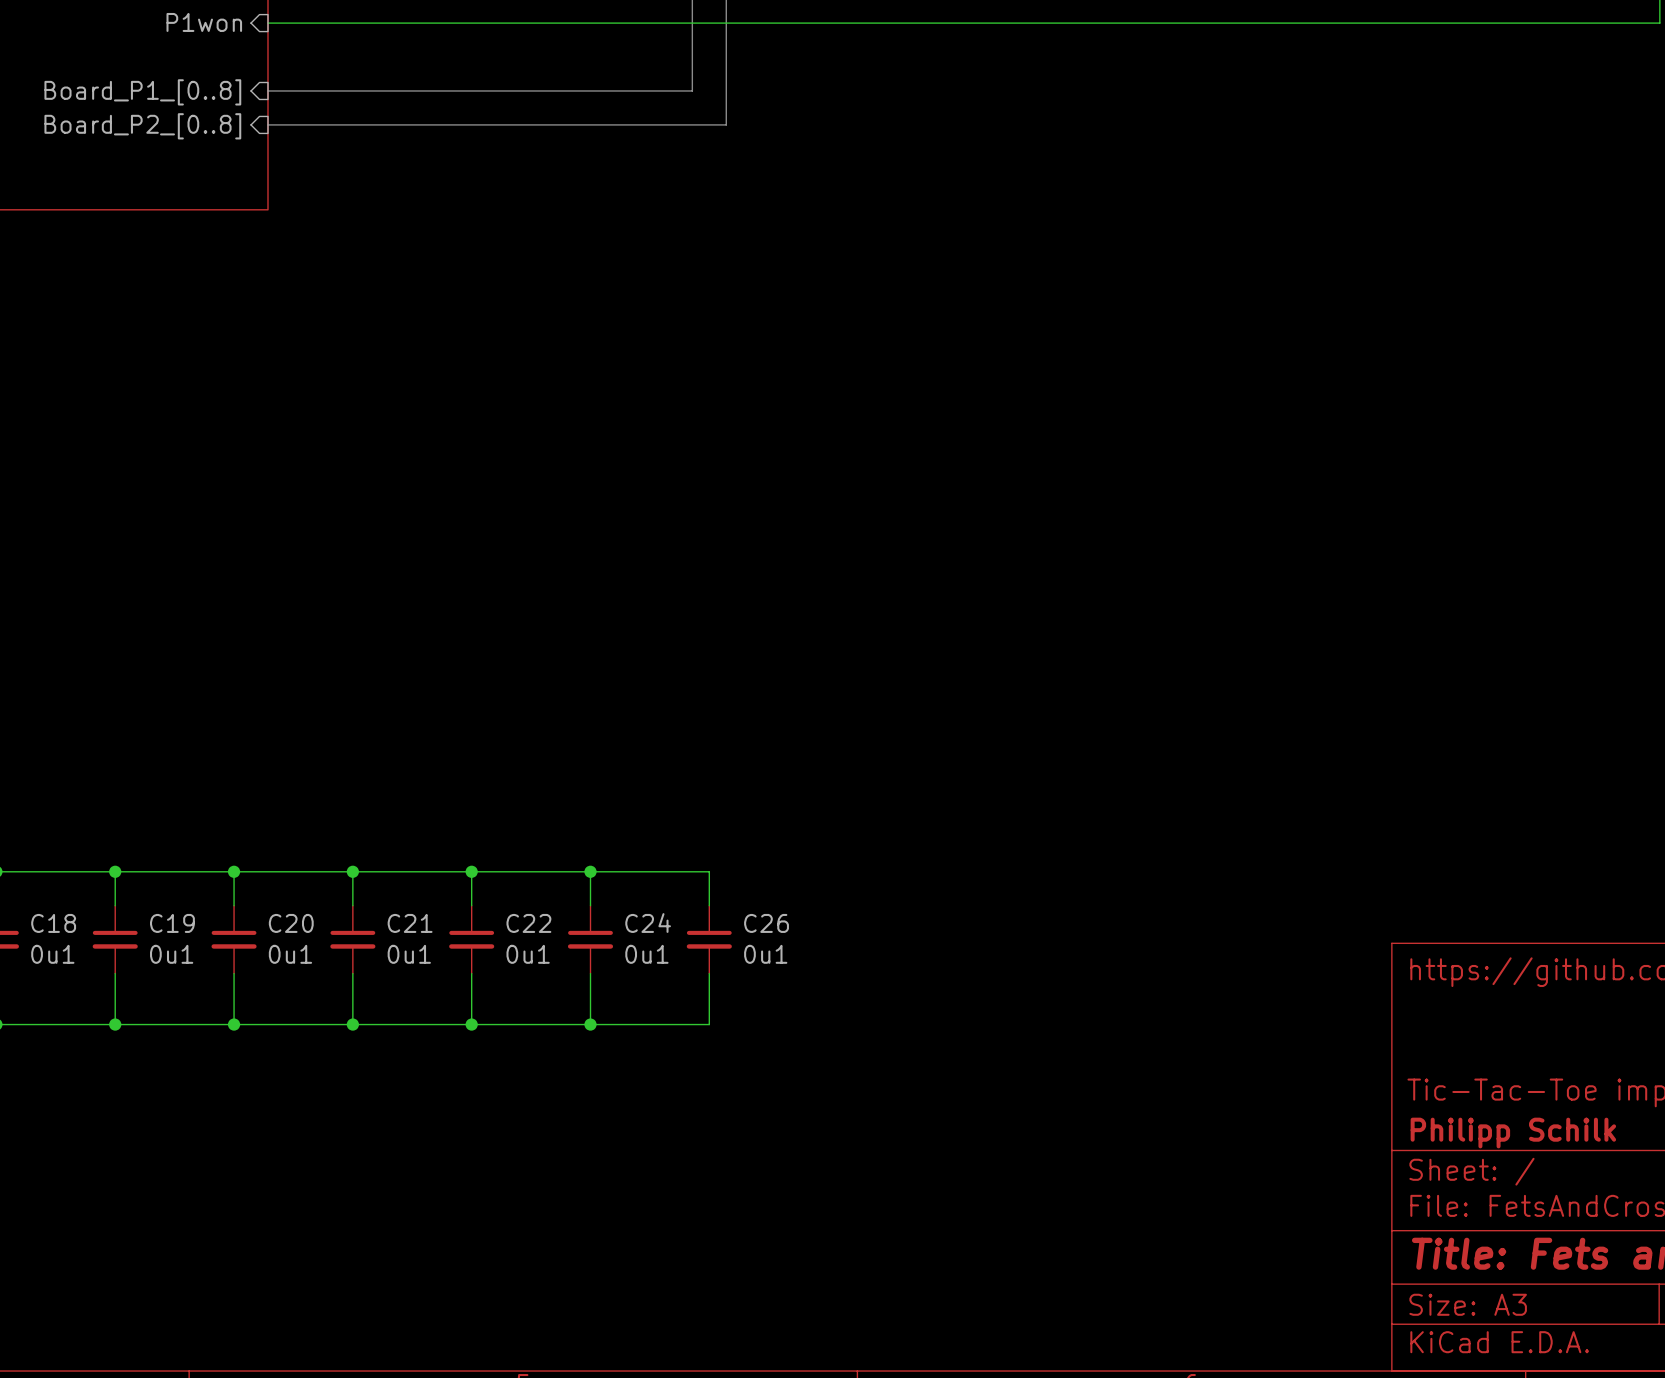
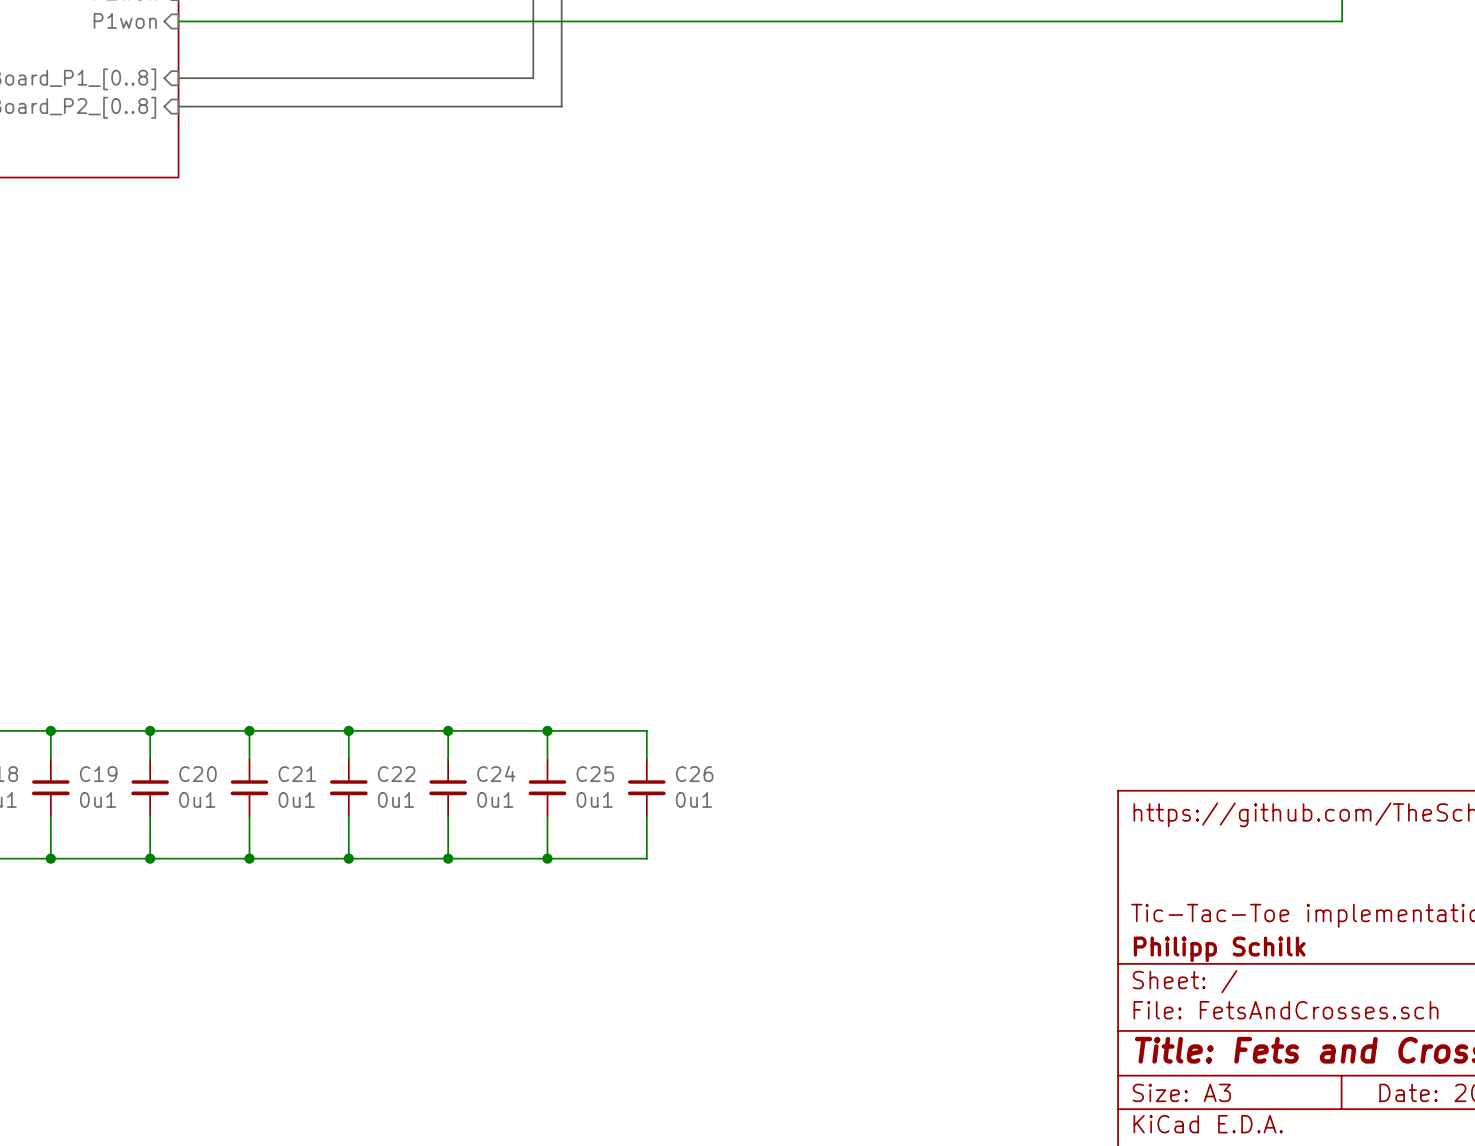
wire: none -> (547, 730) (646, 730) (646, 759)
junction: none -> (547, 730)
C26 name: C26 (766, 923) -> C25 (595, 774)
C26: none -> 0u1 (646, 787)
wire: none -> (646, 816) (646, 858) (547, 858)
junction: none -> (547, 858)

